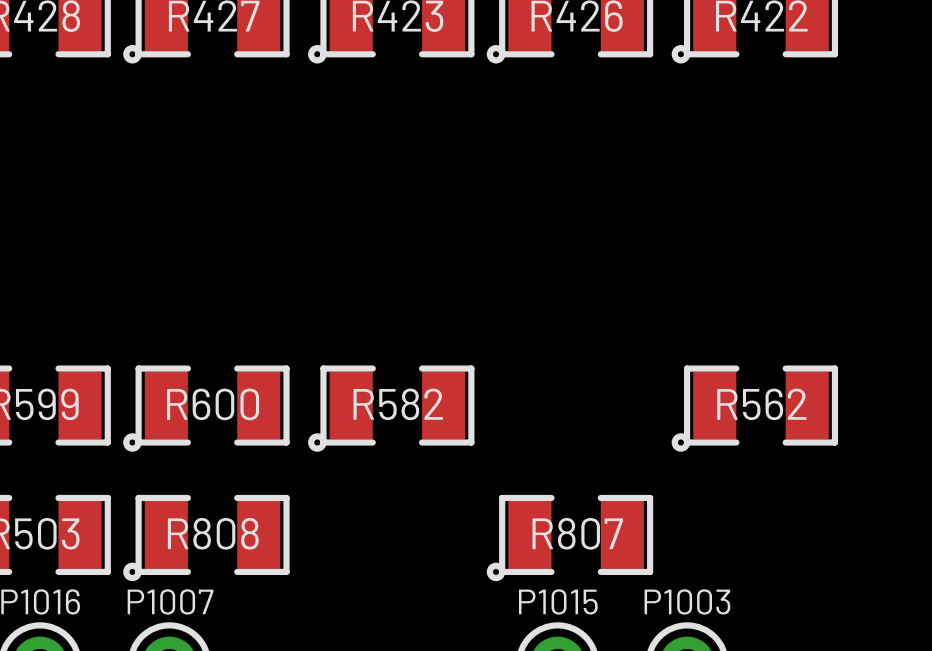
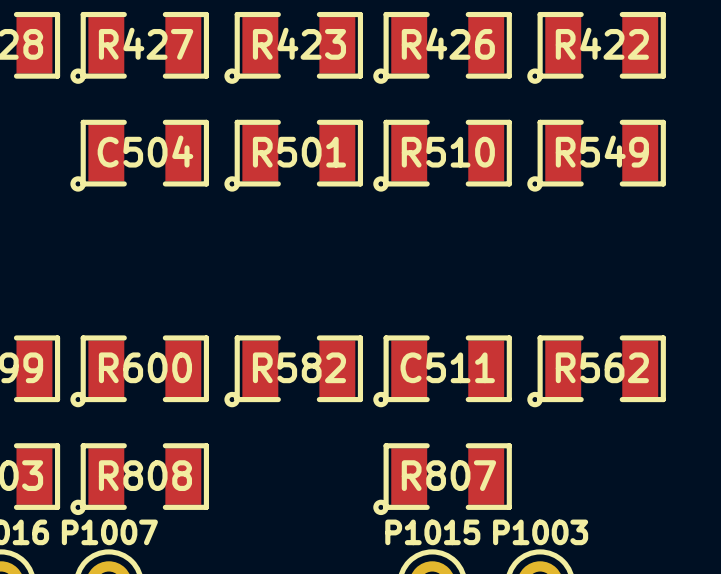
C504: none -> (139, 155)
R501: none -> (293, 155)
R510: none -> (442, 155)
R549: none -> (596, 155)
C511: none -> (442, 371)

